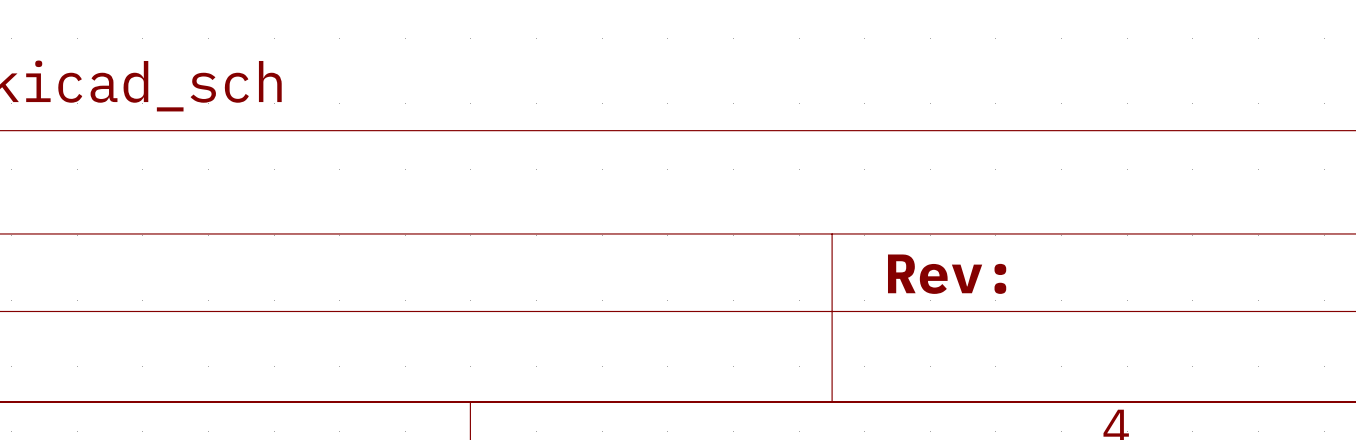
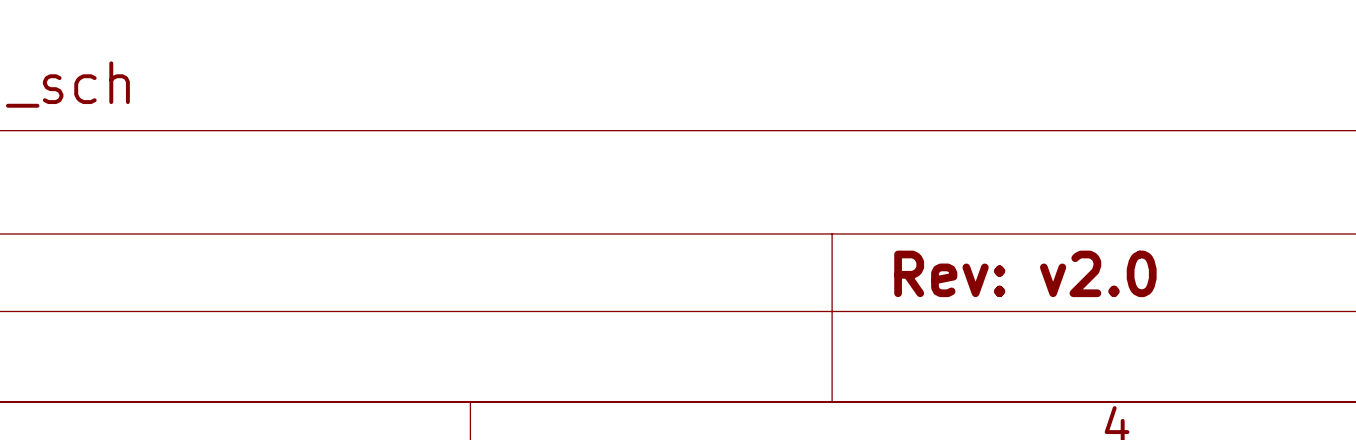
title block: Rev: (947, 274) -> Rev: v2.0 (1025, 273)

